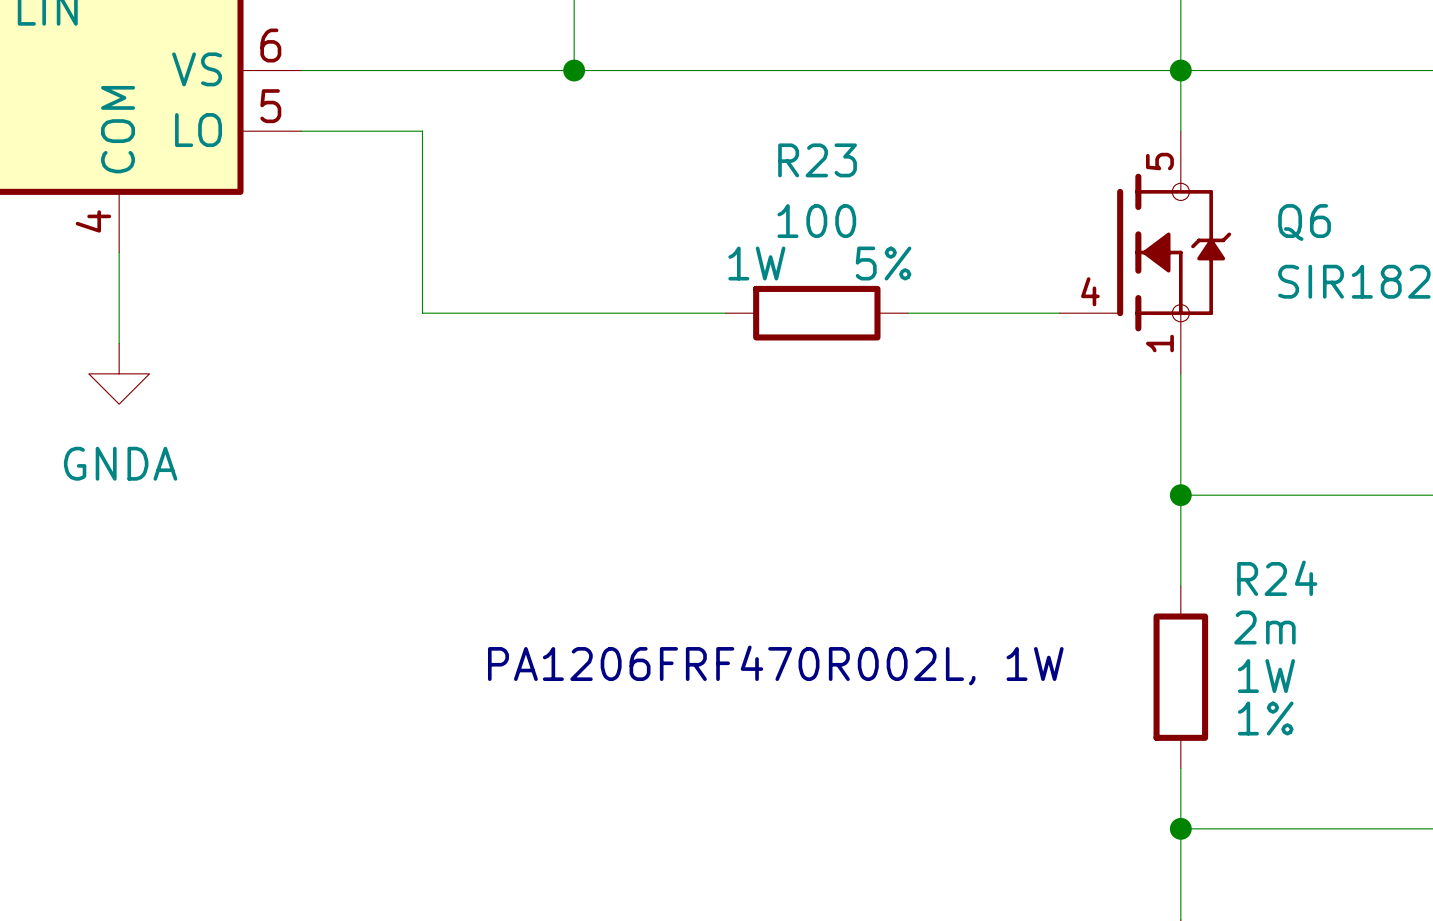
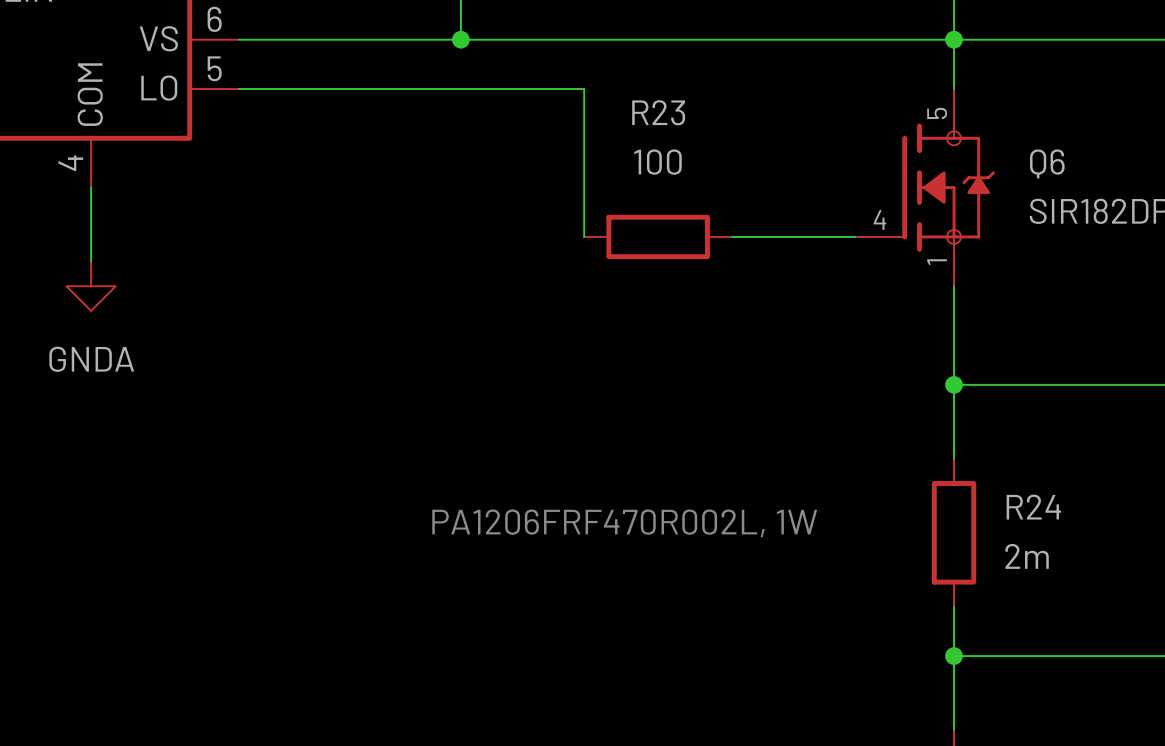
wire: (422, 131) (422, 313) (725, 313) -> (337, 89) (584, 89) (584, 236)
R23 text: 1W (756, 263) -> none
R23 text: 5% (883, 263) -> none
R24 name position: R24 (1277, 578) -> R24 (1033, 507)
R24 value position: 2m (1264, 627) -> 2m (1027, 556)
R24 text: 1W (1266, 676) -> none
R24 text: 1% (1265, 718) -> none

